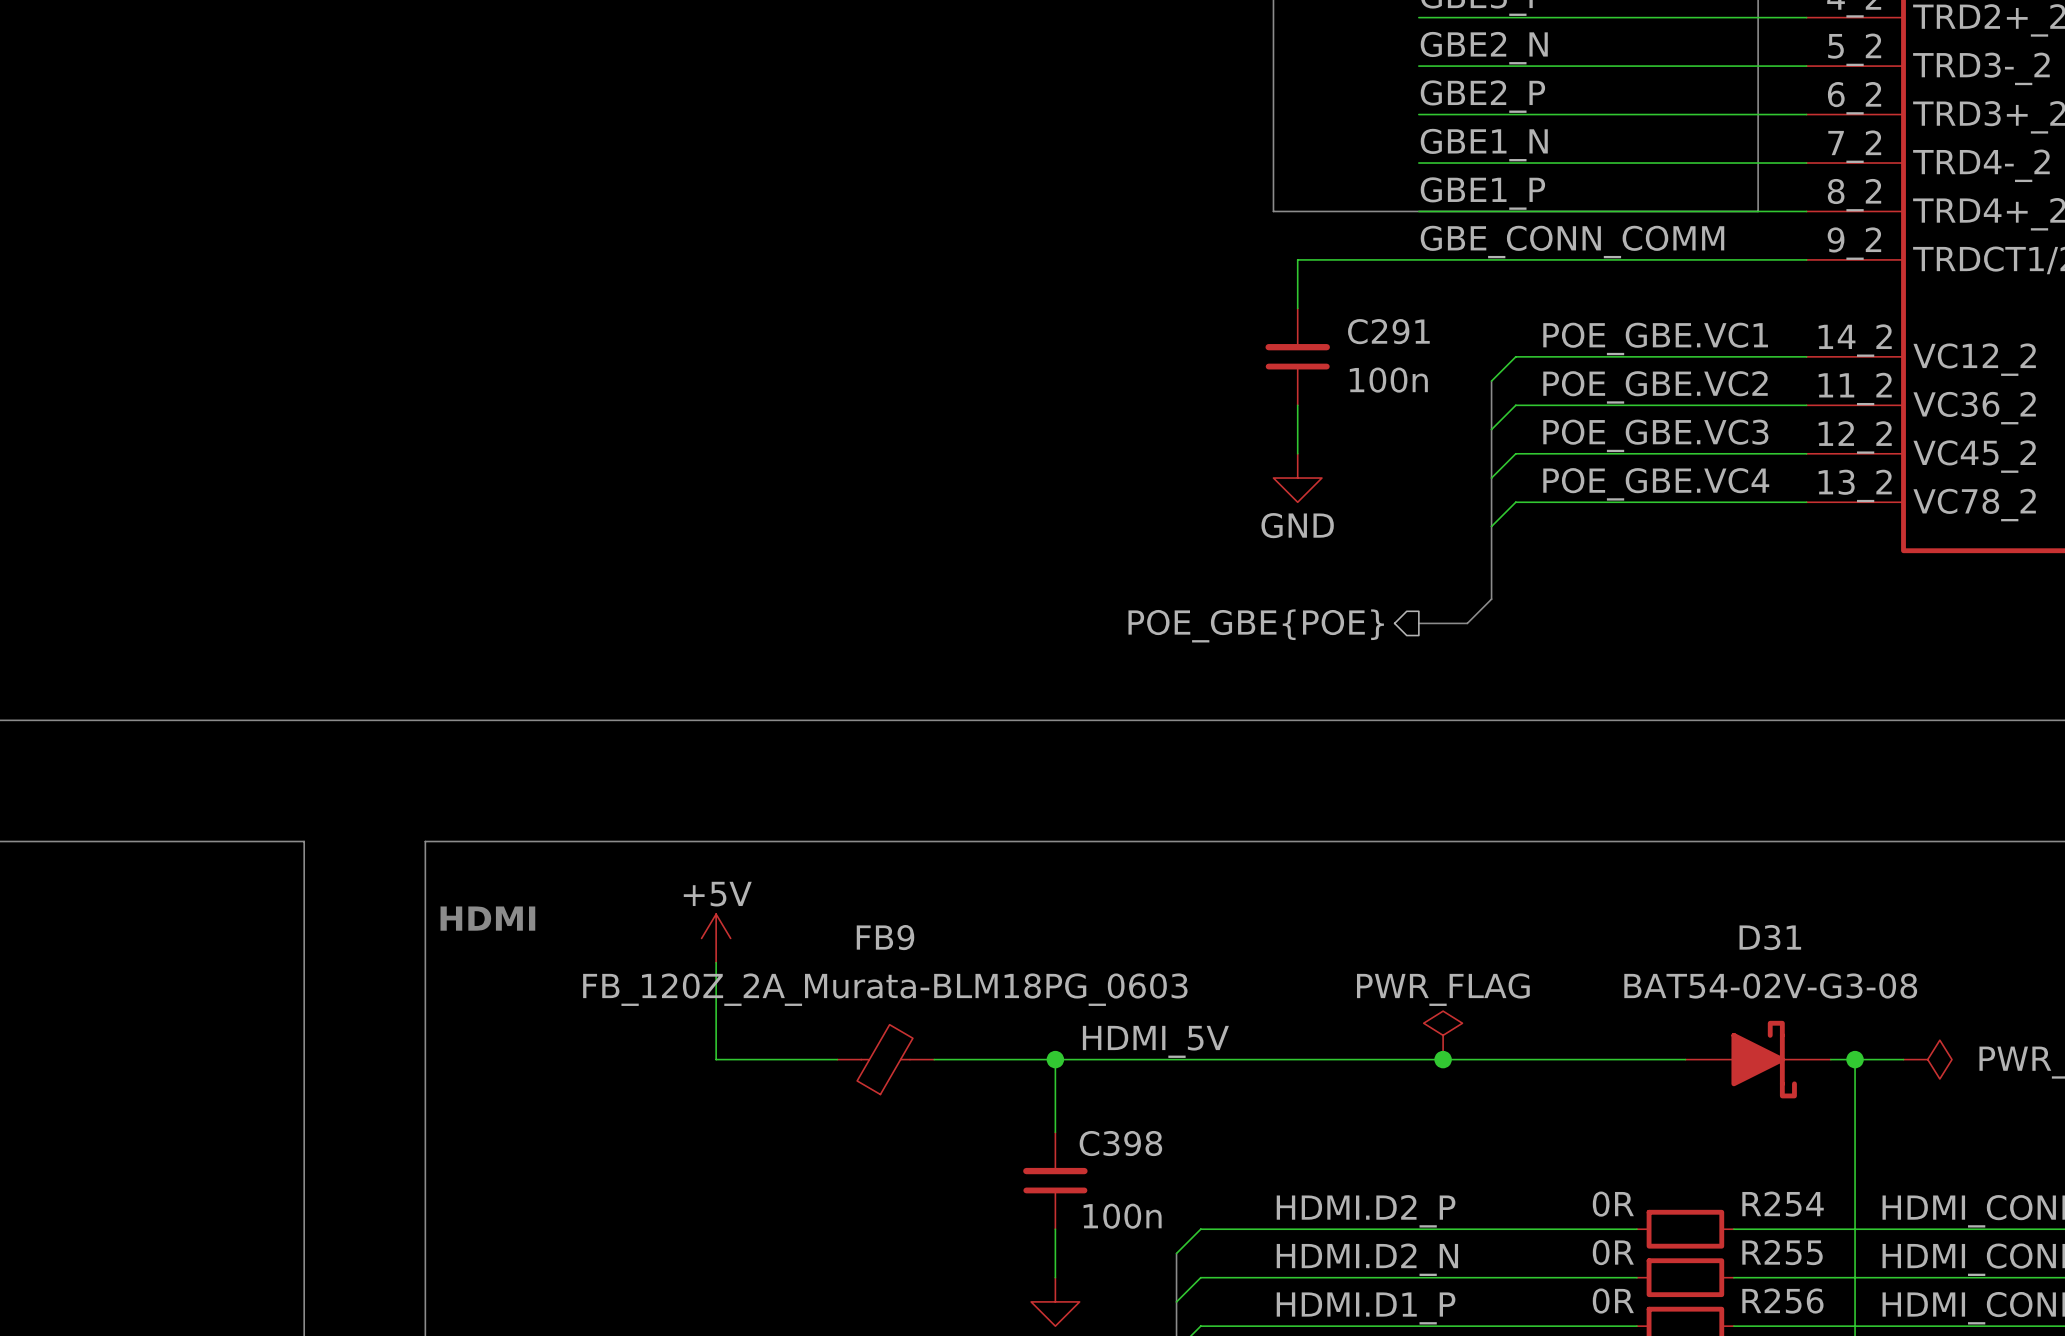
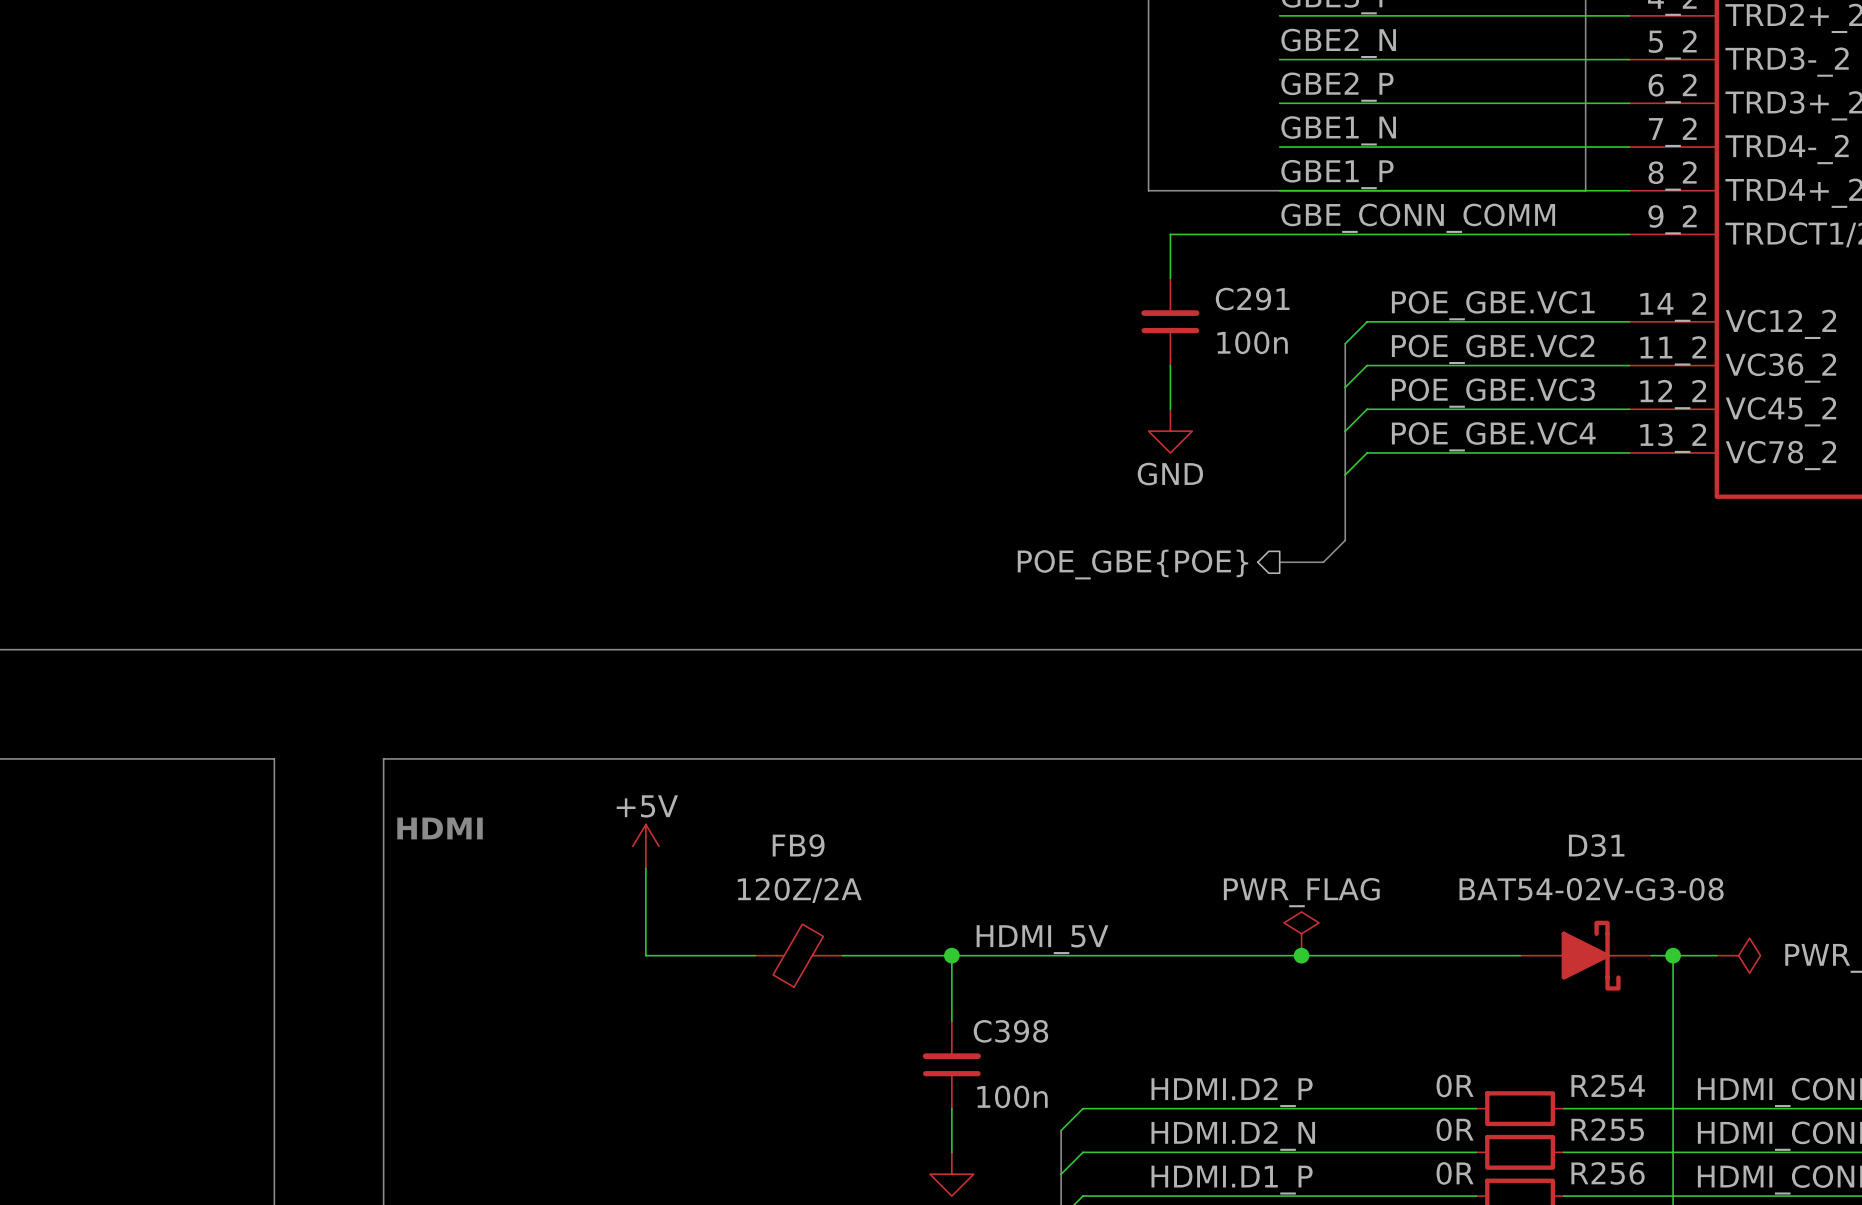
D31 text: none -> BAT54-02V-G3-08 (1591, 889)
D31 value: BAT54-02V-G3-08 (1770, 986) -> none
FB9 text: none -> 120Z/2A (799, 890)
FB9 value: FB_120Z_2A_Murata-BLM18PG_0603 (885, 989) -> none

